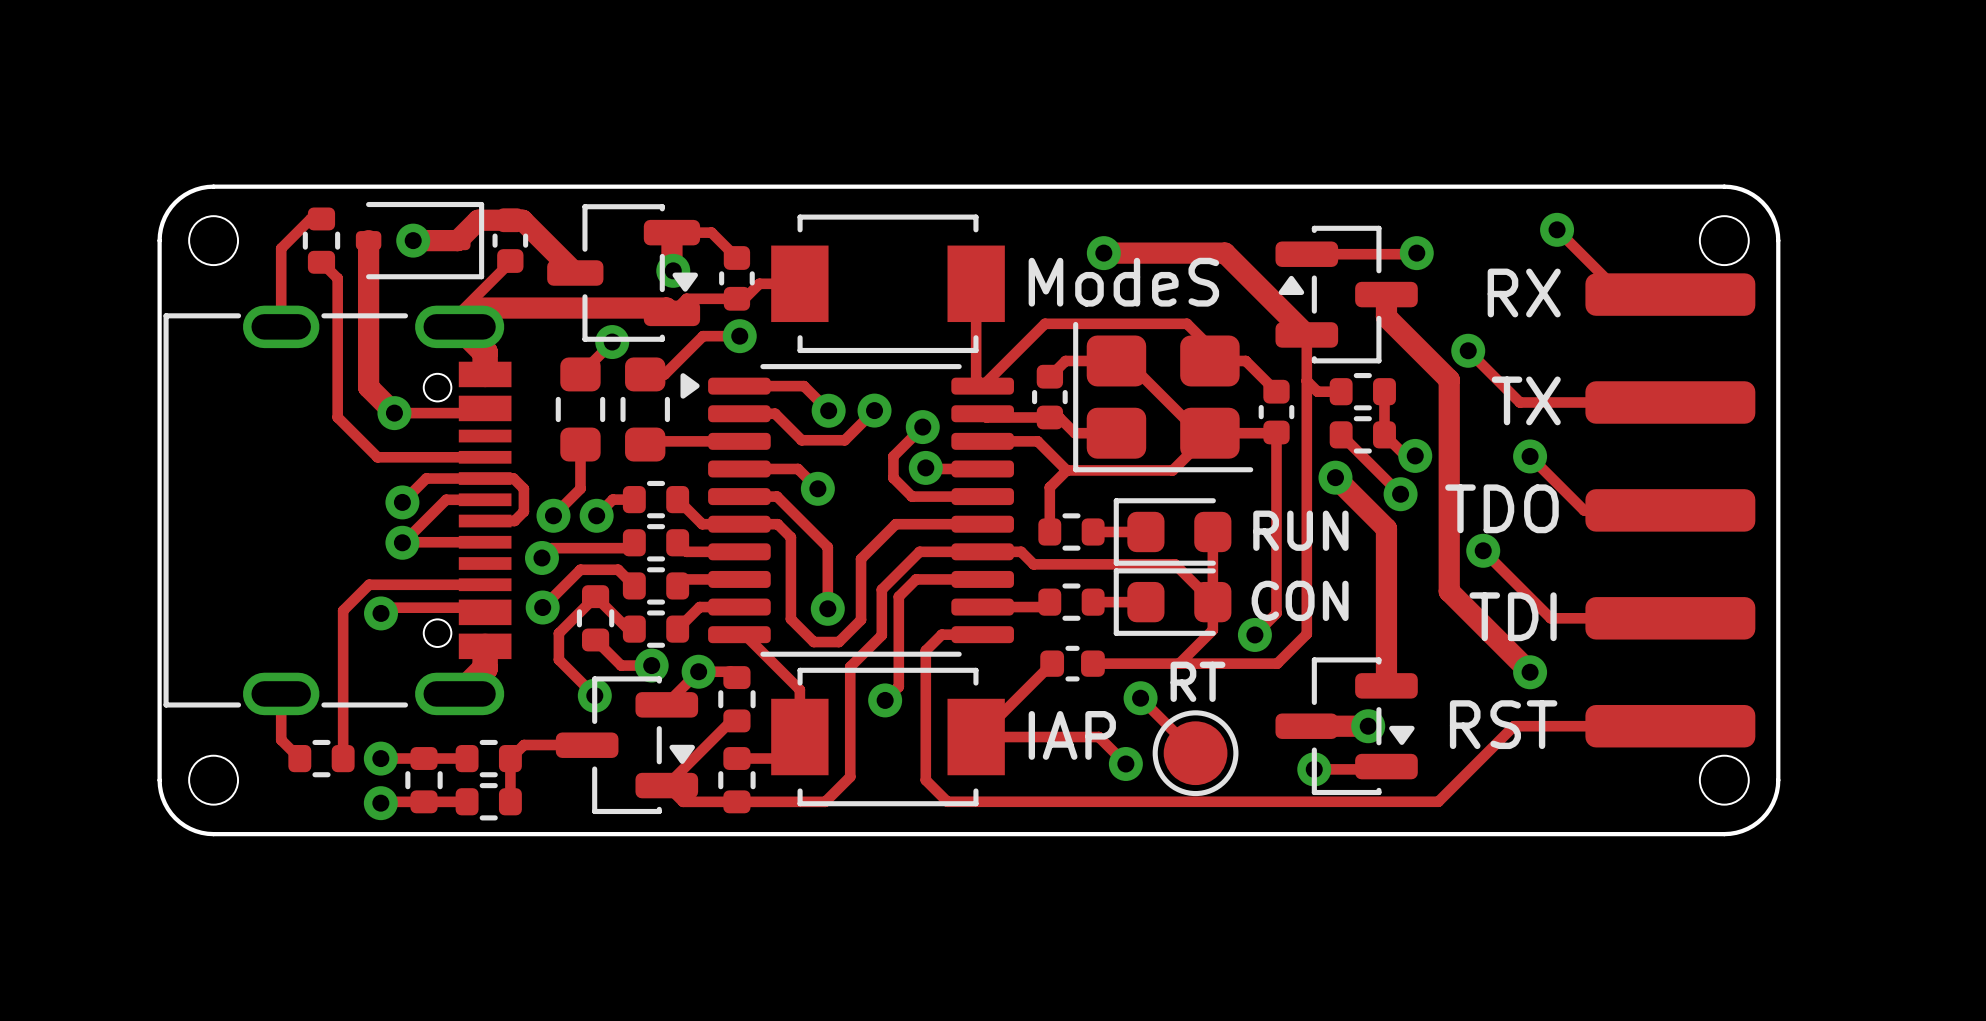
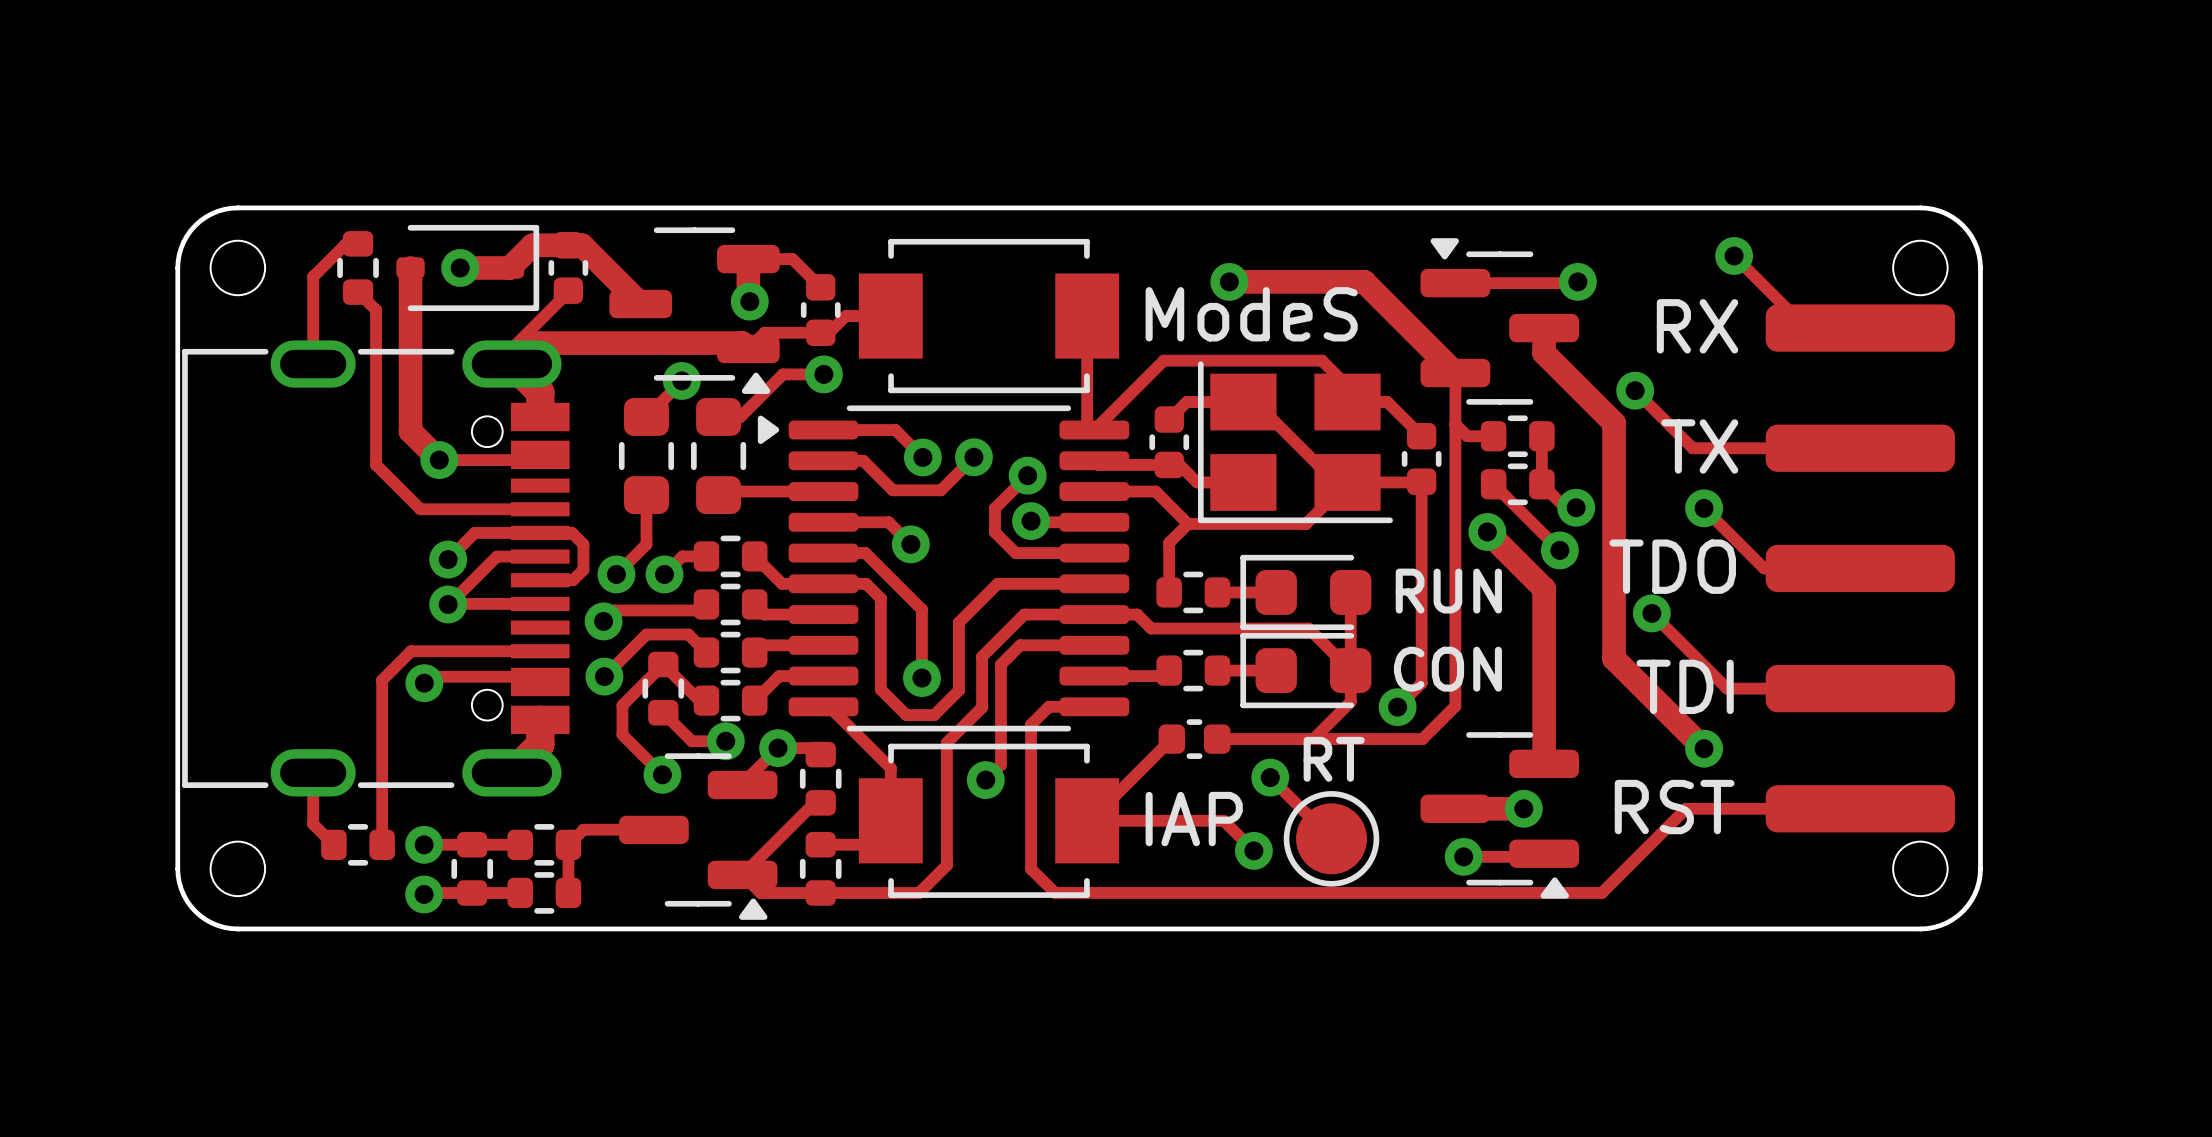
part footprint: [547, 204, 701, 342] -> [609, 227, 780, 394]
part footprint: [1275, 225, 1418, 364] -> [1420, 238, 1580, 405]
part footprint: [1073, 321, 1254, 473] -> [1197, 361, 1393, 524]
part footprint: [1275, 657, 1418, 796] -> [1420, 732, 1580, 899]
part footprint: [555, 676, 699, 815] -> [619, 753, 778, 920]

